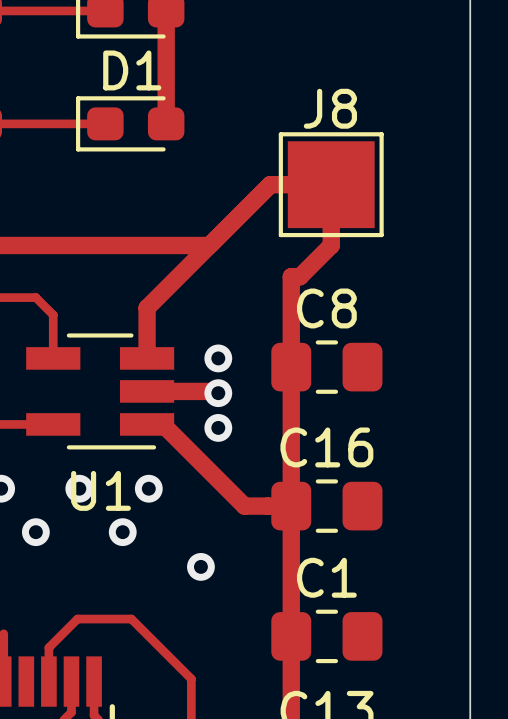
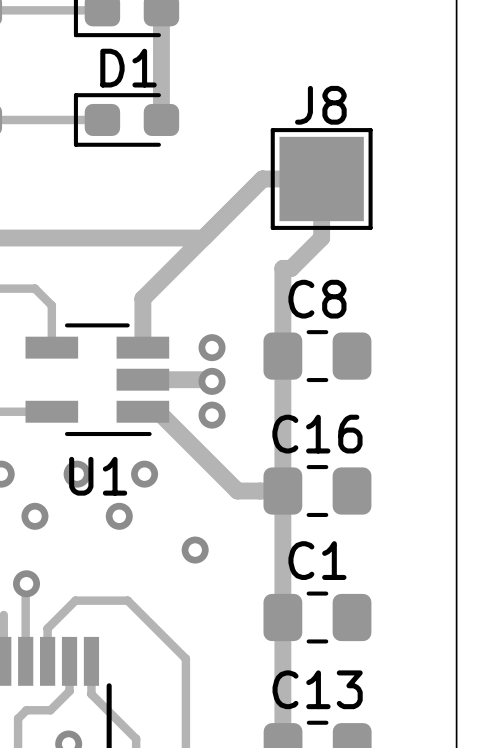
track: none -> (26, 583) (25, 661)
via: none -> (26, 583)

